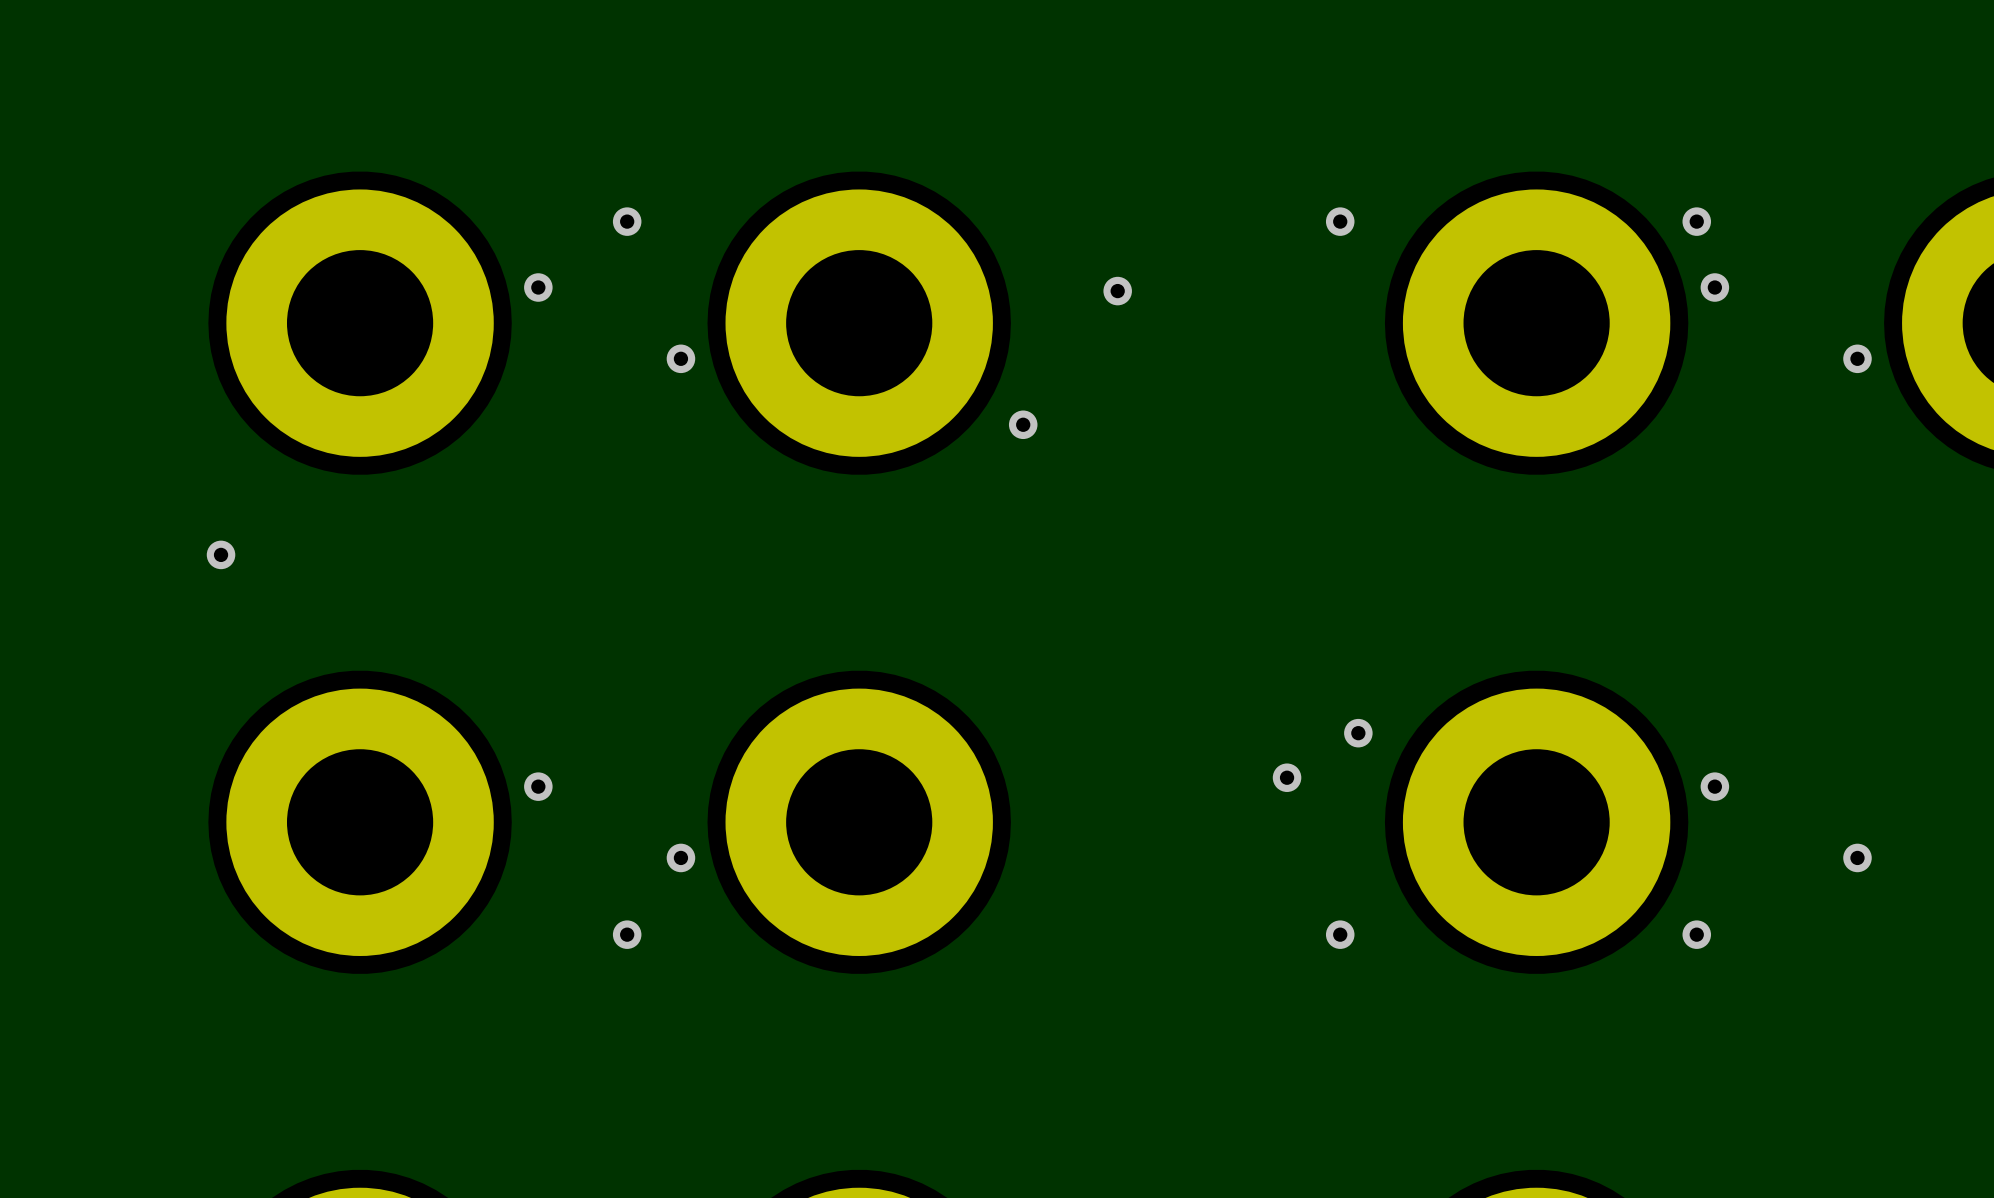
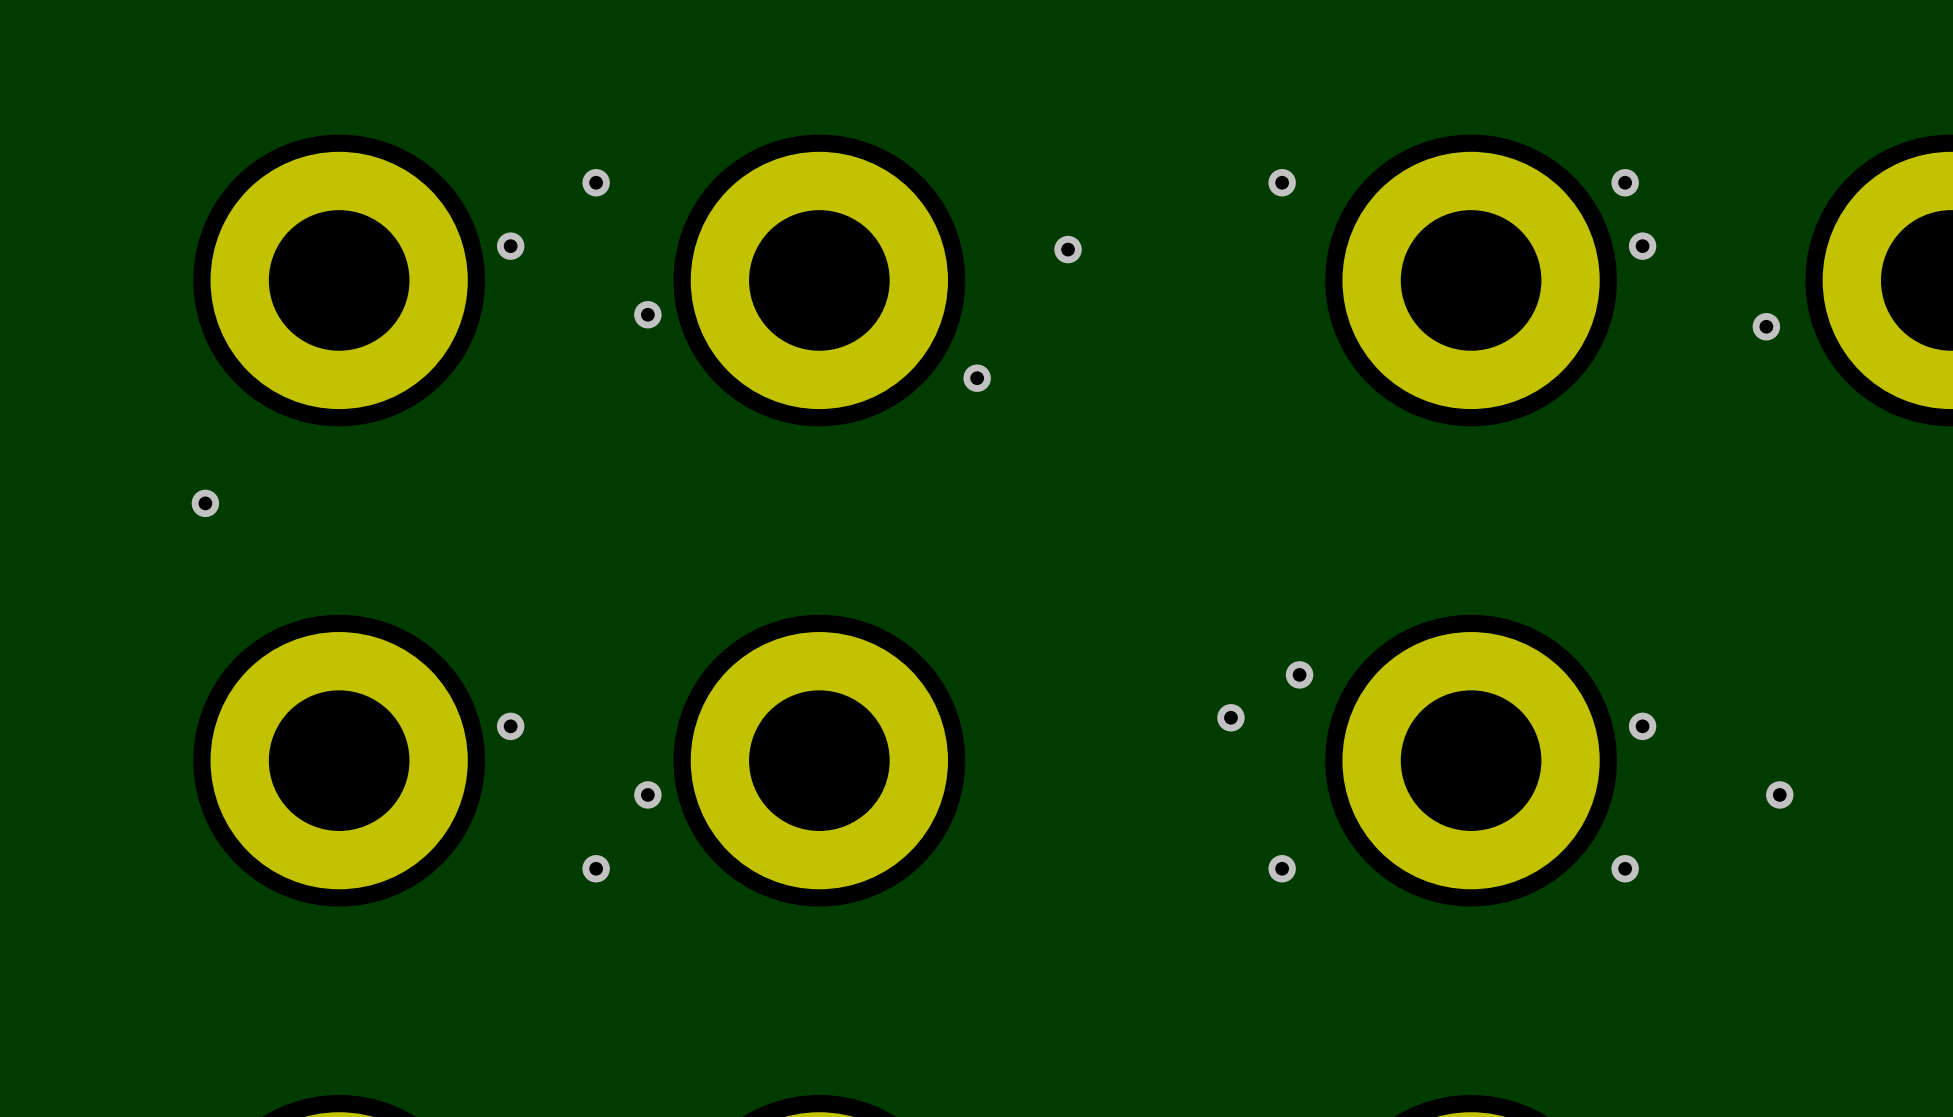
via position: (1857, 358) -> (1766, 326)

